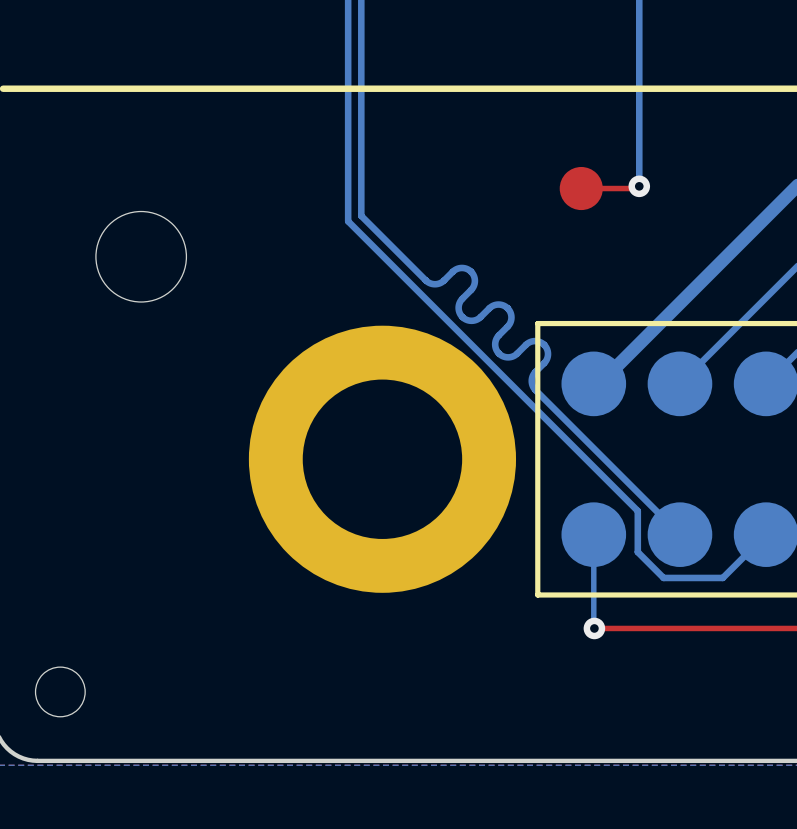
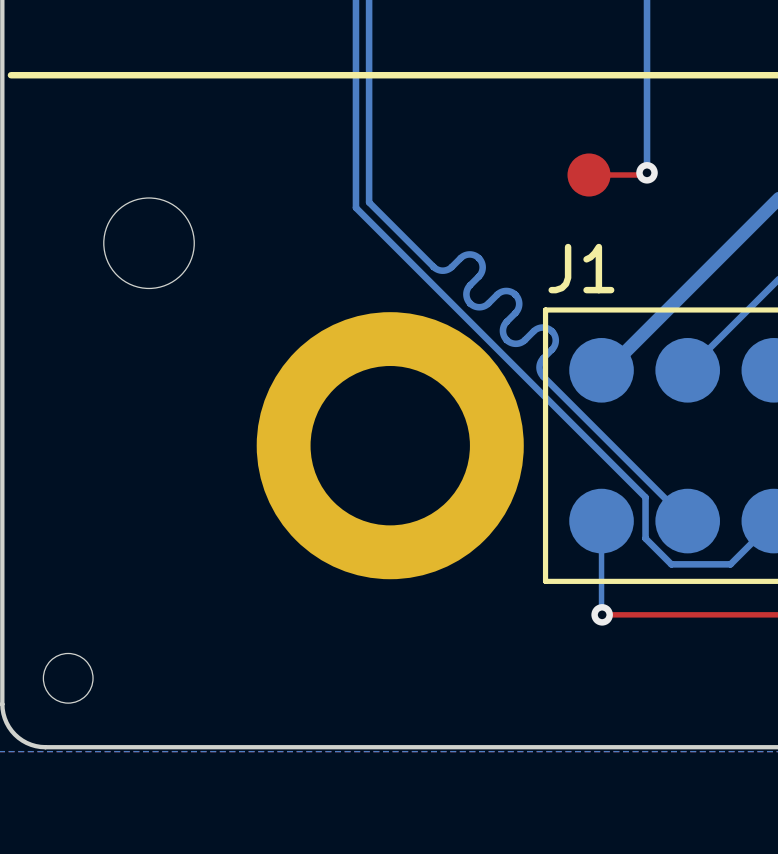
J1 name: none -> J1 (581, 268)

